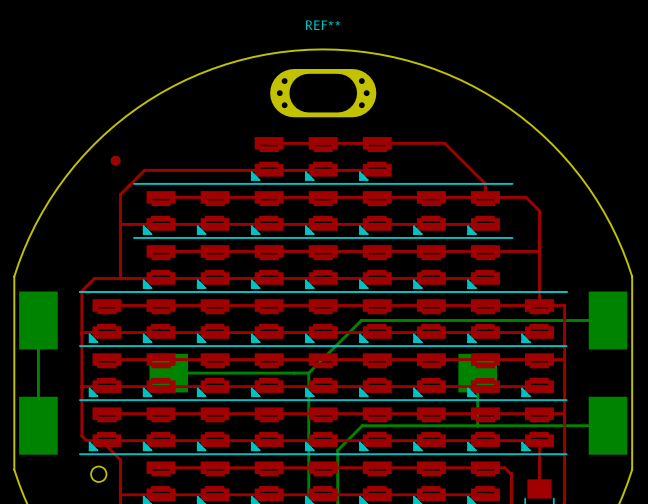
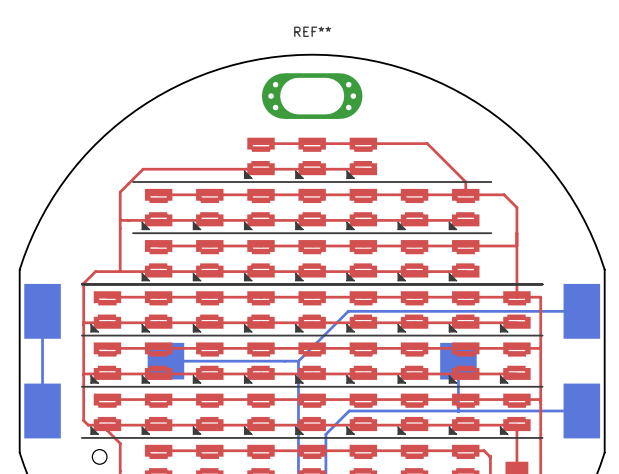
part: (115, 160) -> none

